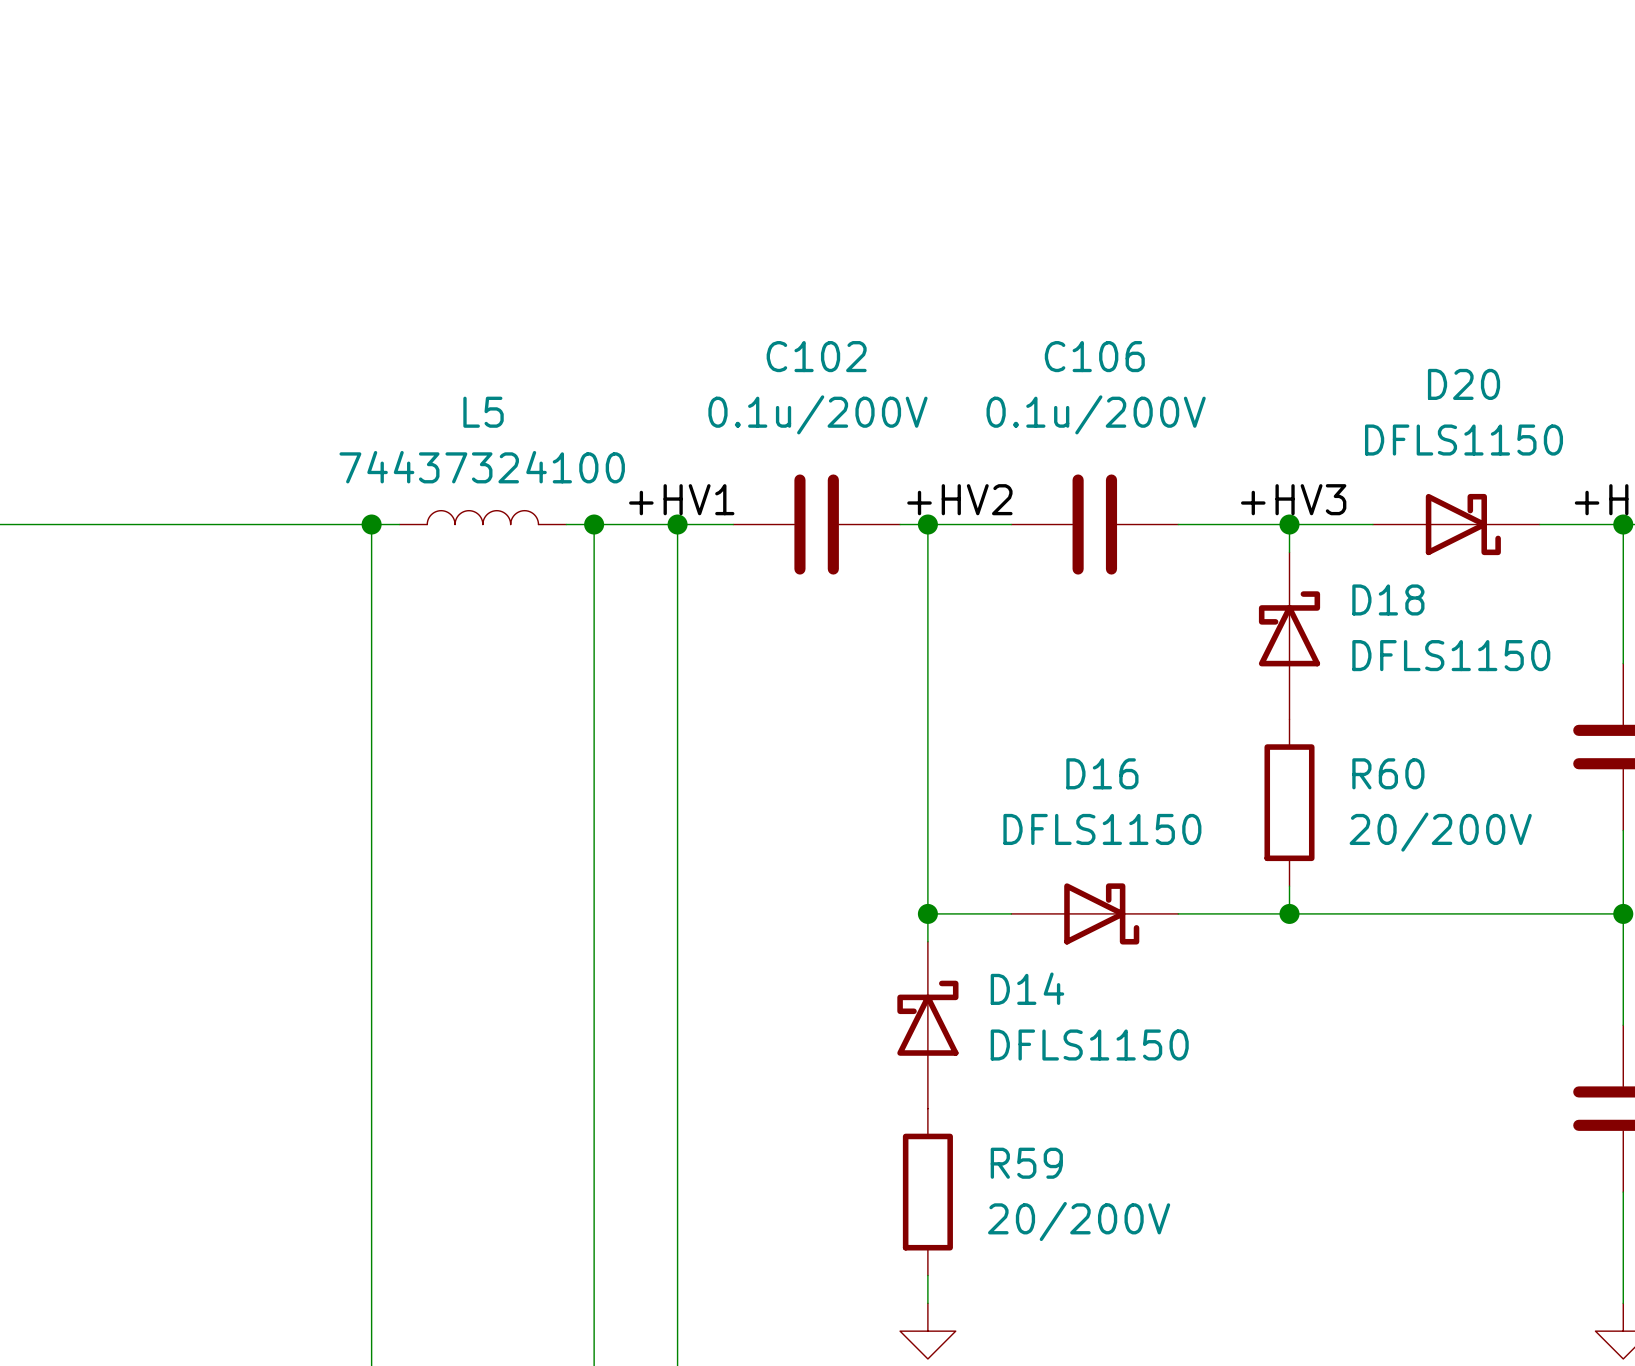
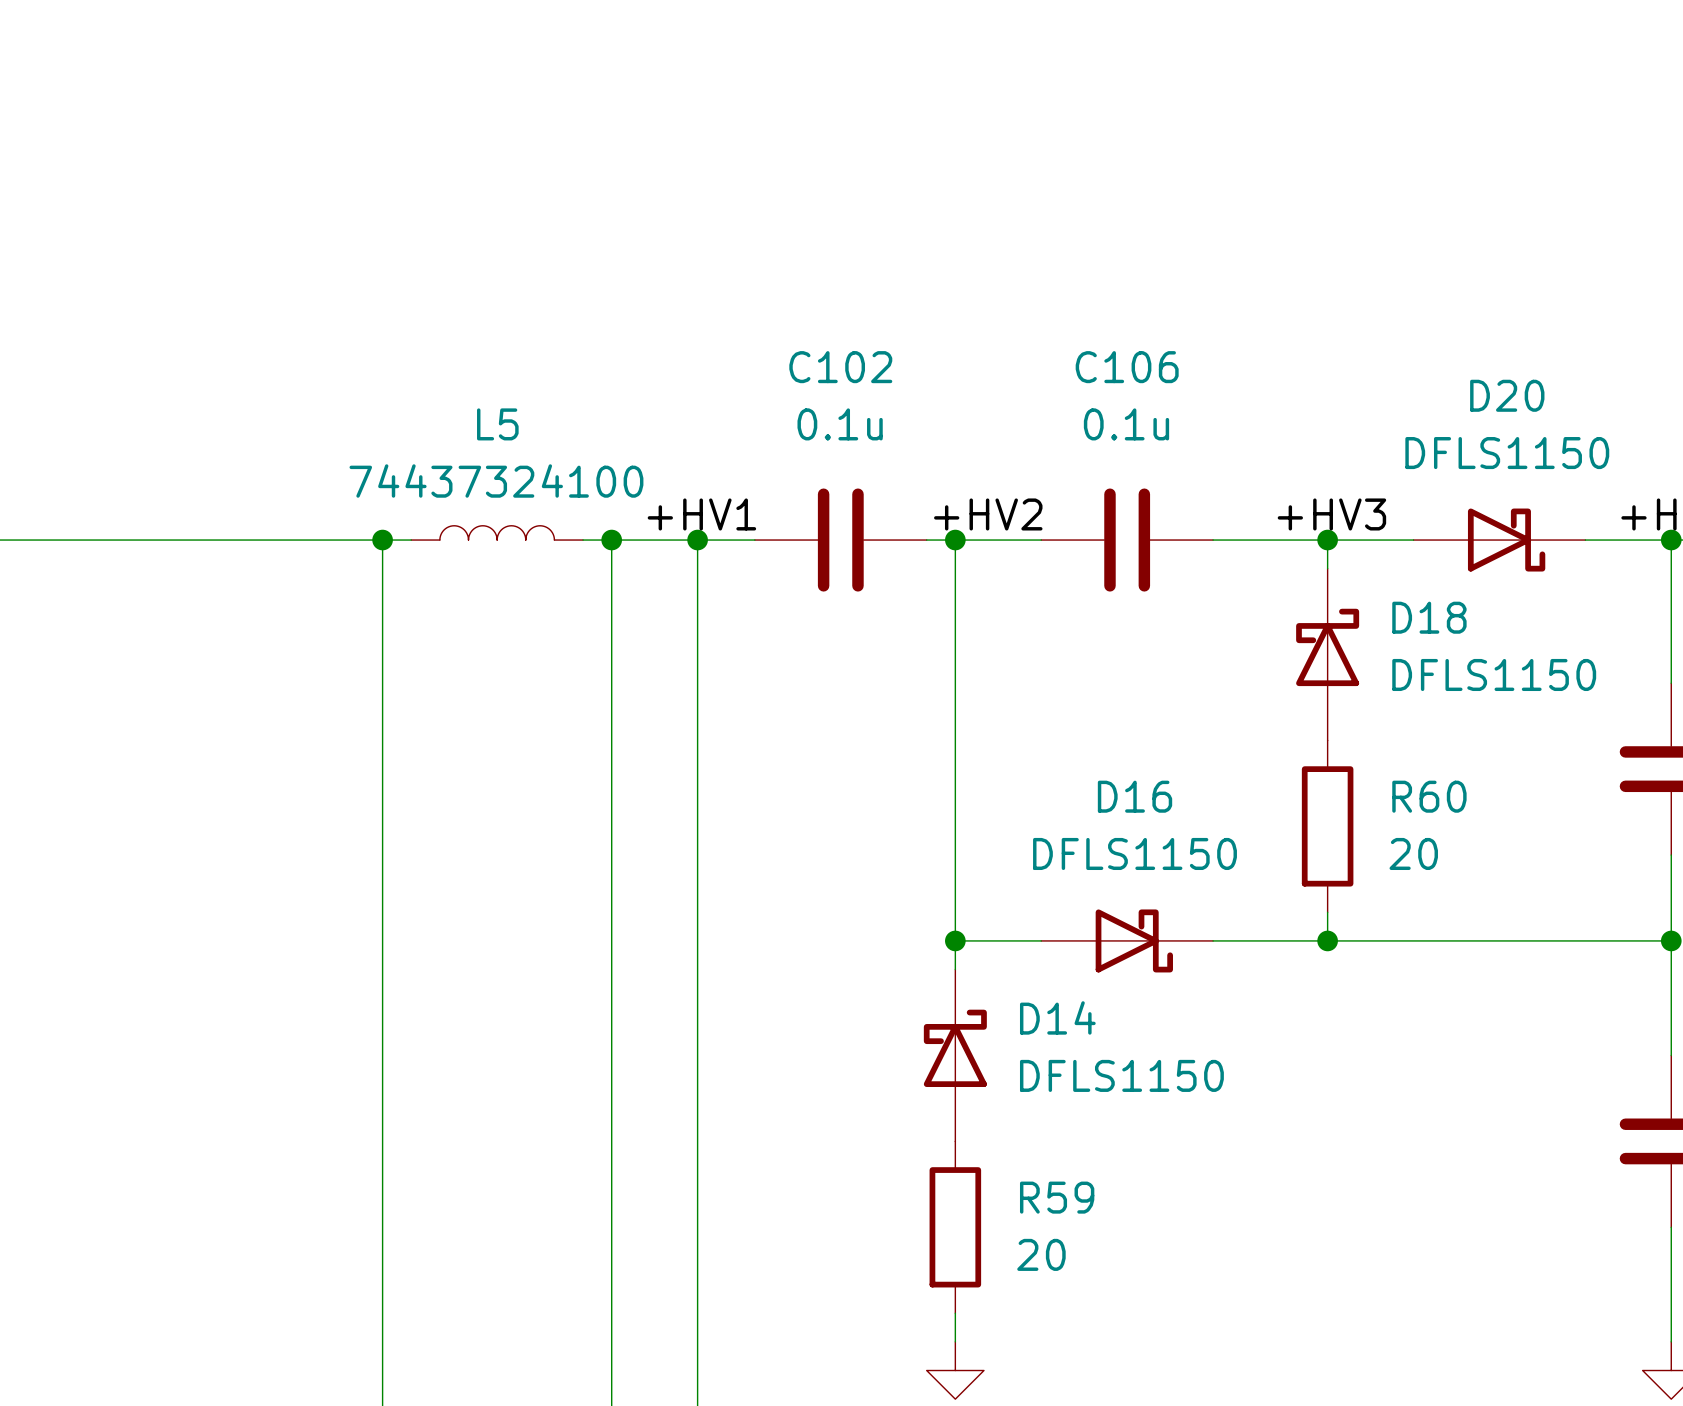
C102 value: 0.1u/200V (817, 414) -> 0.1u (840, 424)
C106 value: 0.1u/200V (1096, 414) -> 0.1u (1126, 424)
R60 value: 20/200V (1440, 832) -> 20 (1413, 853)
R59 value: 20/200V (1079, 1221) -> 20 (1041, 1254)

